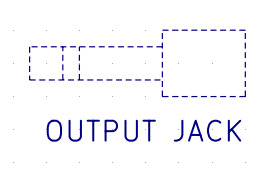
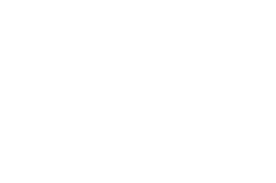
line: (162, 30) (162, 96) (245, 96) (245, 30) (162, 30) -> none
line: (62, 46) (62, 79) -> none
line: (79, 46) (79, 79) -> none
line: (162, 46) (29, 46) (29, 79) (162, 79) -> none
text: OUTPUT JACK (143, 130) -> none

